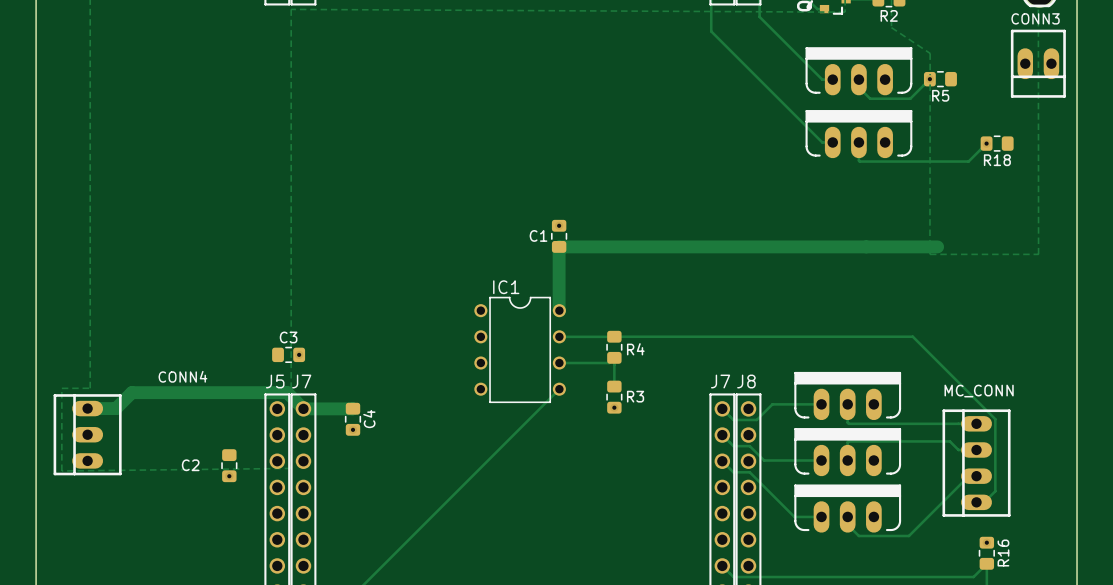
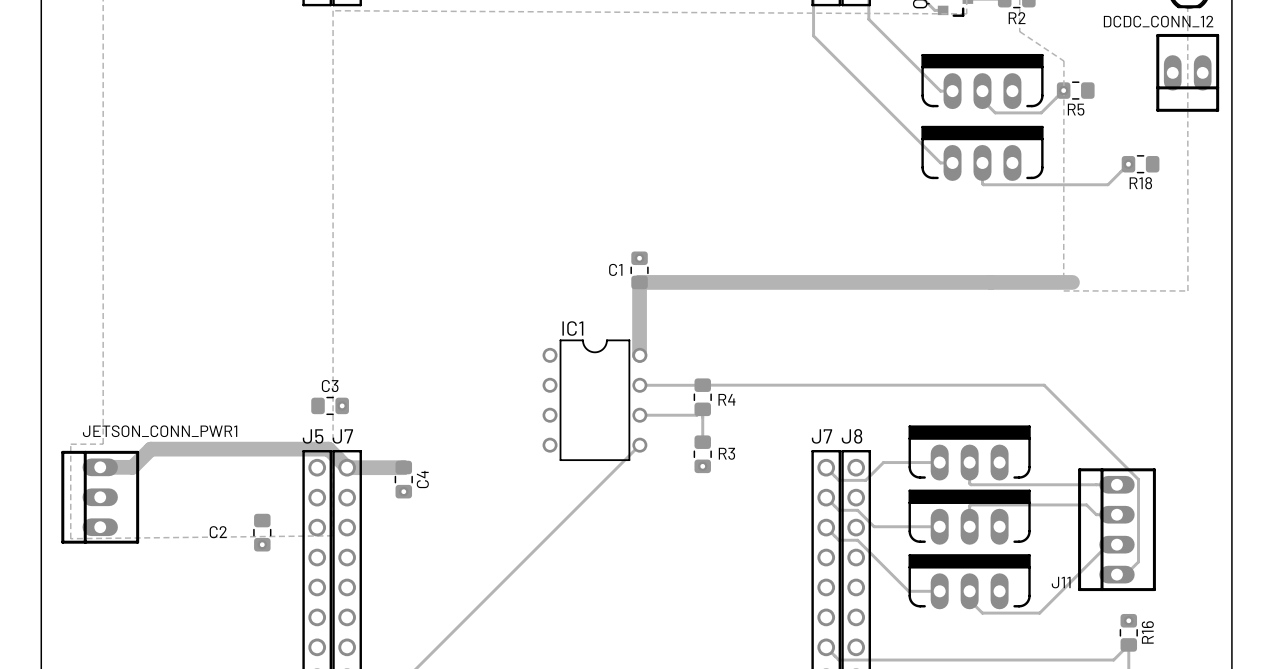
CONN3 name: CONN3 (1035, 18) -> DCDC_CONN_12 (1158, 21)
CONN4 name: CONN4 (182, 376) -> JETSON_CONN_PWR1 (160, 431)
text: MC_CONN (979, 391) -> none
J11 name: none -> J11 (1061, 582)

